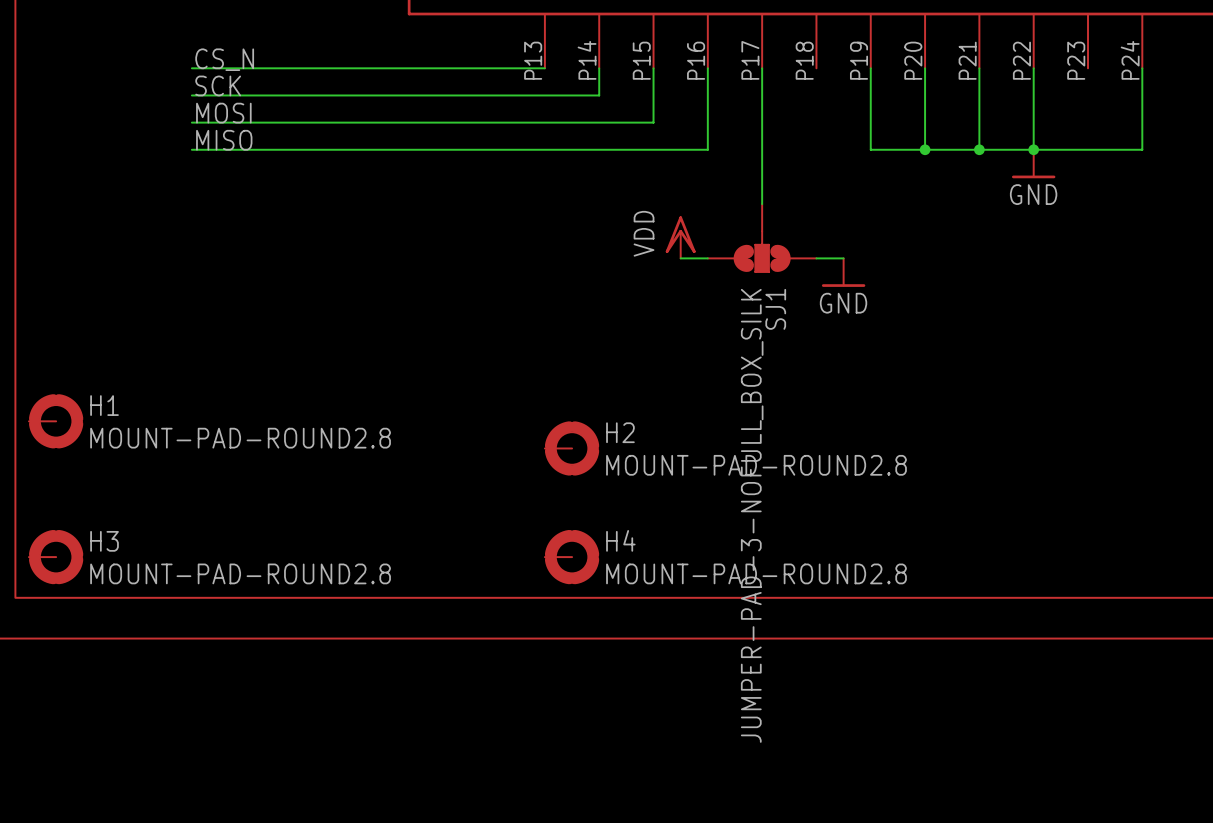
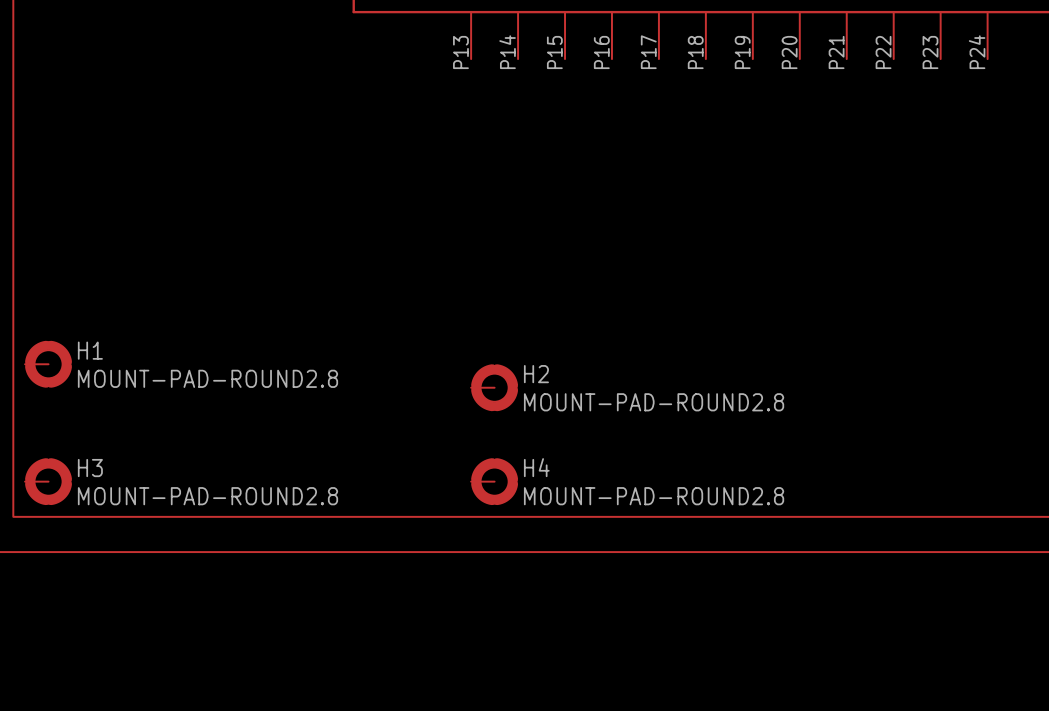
label: CS_N (224, 59) -> none
wire: (191, 68) (544, 68) -> none
wire: (599, 68) (599, 95) (191, 95) -> none
wire: (653, 68) (653, 122) (191, 122) -> none
wire: (707, 68) (707, 149) (191, 149) -> none
wire: (762, 68) (762, 204) -> none
wire: (870, 68) (870, 149) (1142, 149) (1142, 68) -> none
wire: (925, 68) (925, 149) -> none
wire: (979, 68) (979, 149) -> none
wire: (1033, 68) (1033, 149) -> none
label: SCK (218, 85) -> none
label: MOSI (223, 113) -> none
label: MISO (224, 140) -> none
junction: (925, 149) -> none
junction: (979, 149) -> none
junction: (1033, 149) -> none
power symbol: GND (1033, 164) -> none
power symbol: VDD (680, 237) -> none
SJ1: JUMPER-PAD-3-NOFULL_BOX_SILK (762, 238) -> none
wire: (680, 258) (707, 258) -> none
wire: (816, 258) (843, 258) -> none
power symbol: GND (843, 272) -> none

